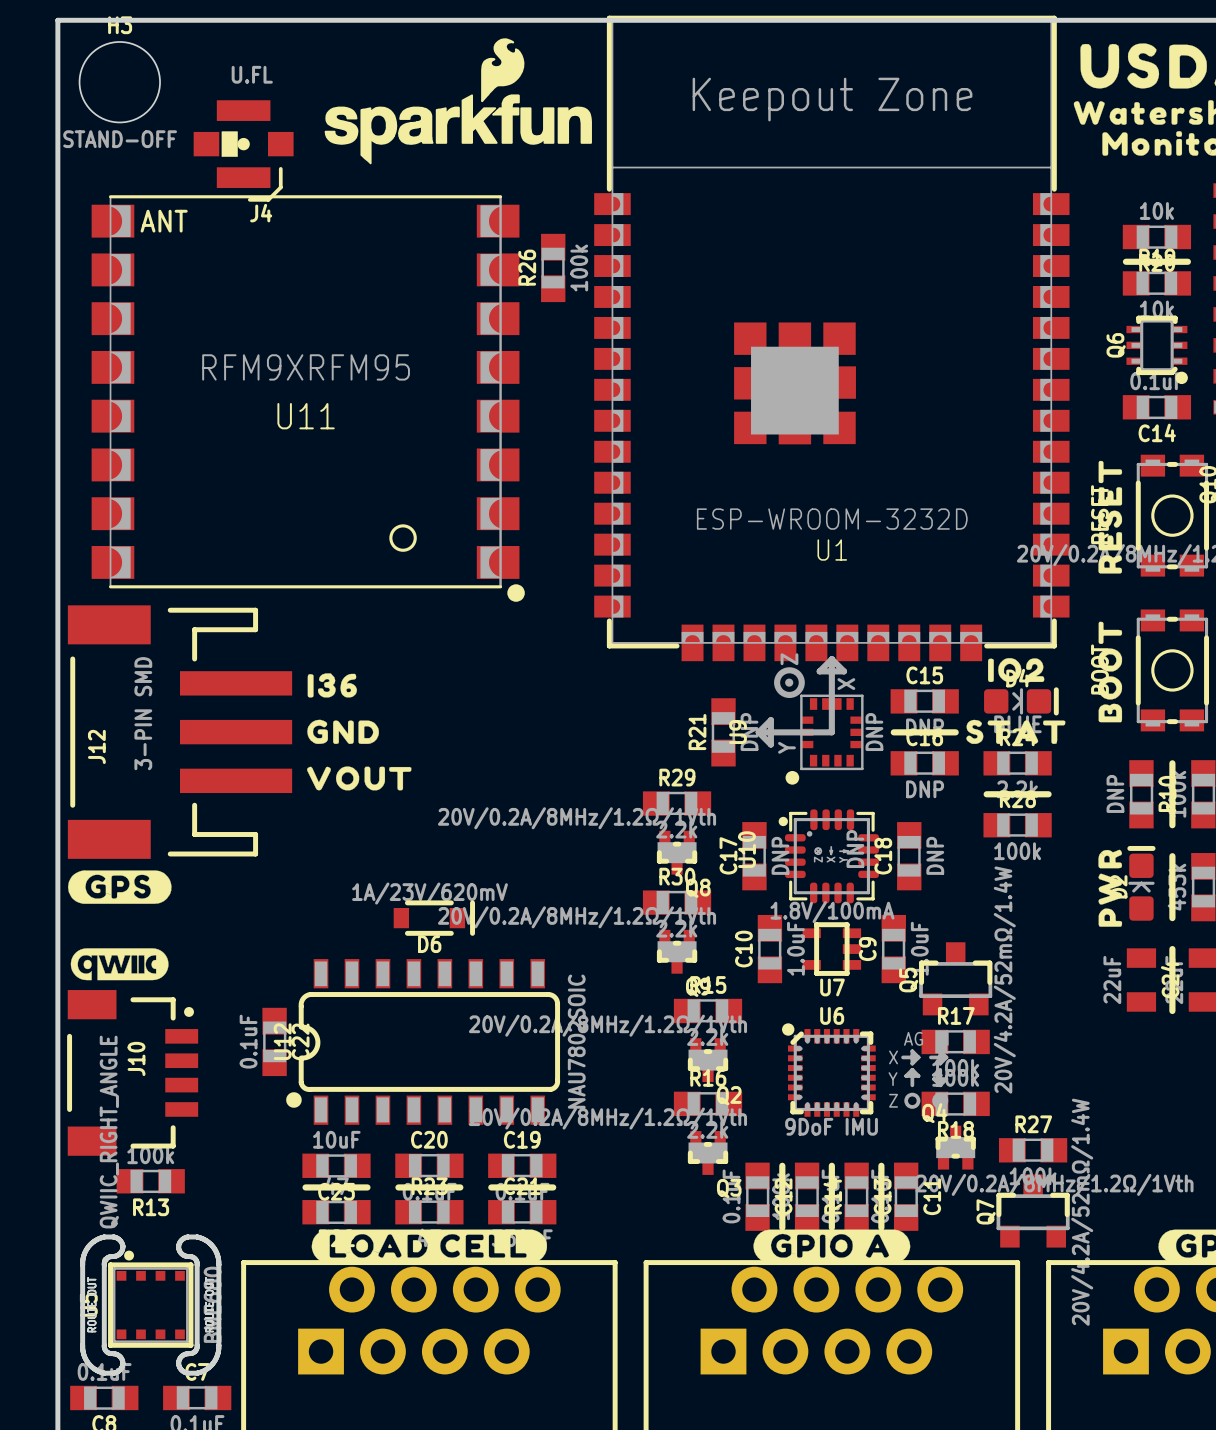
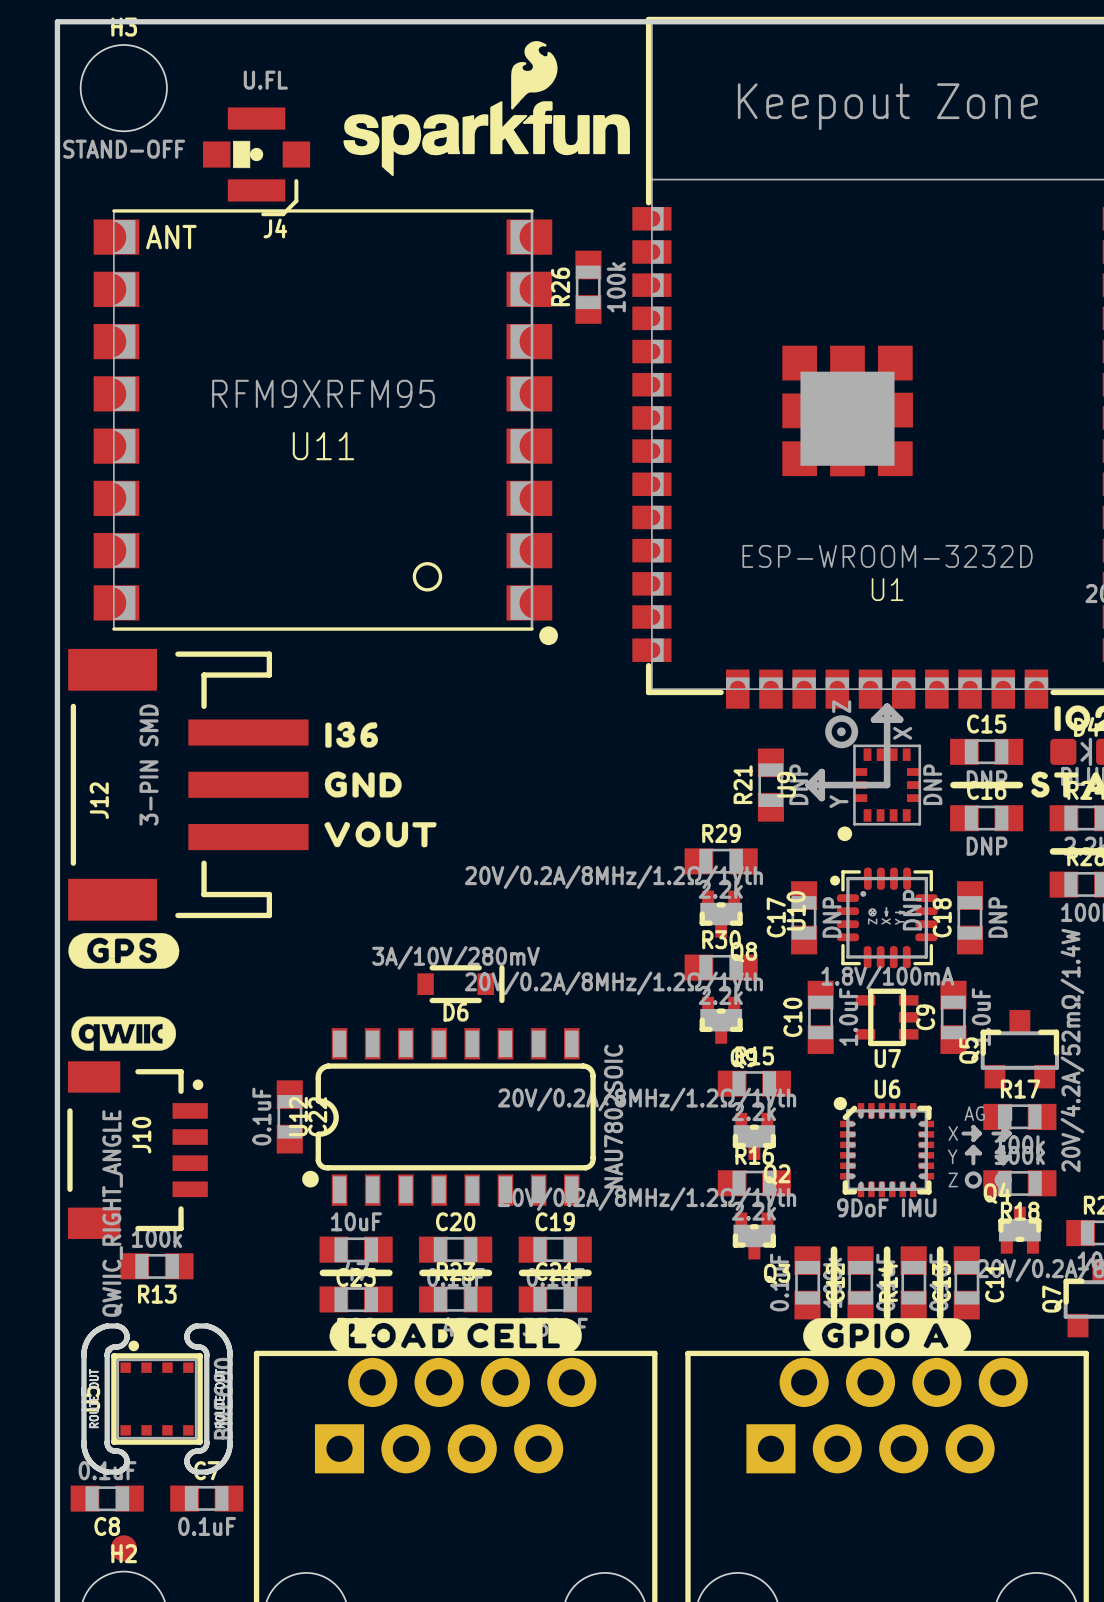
D6 value: 1A/23V/620mV (430, 893) -> 3A/10V/280mV (456, 957)

